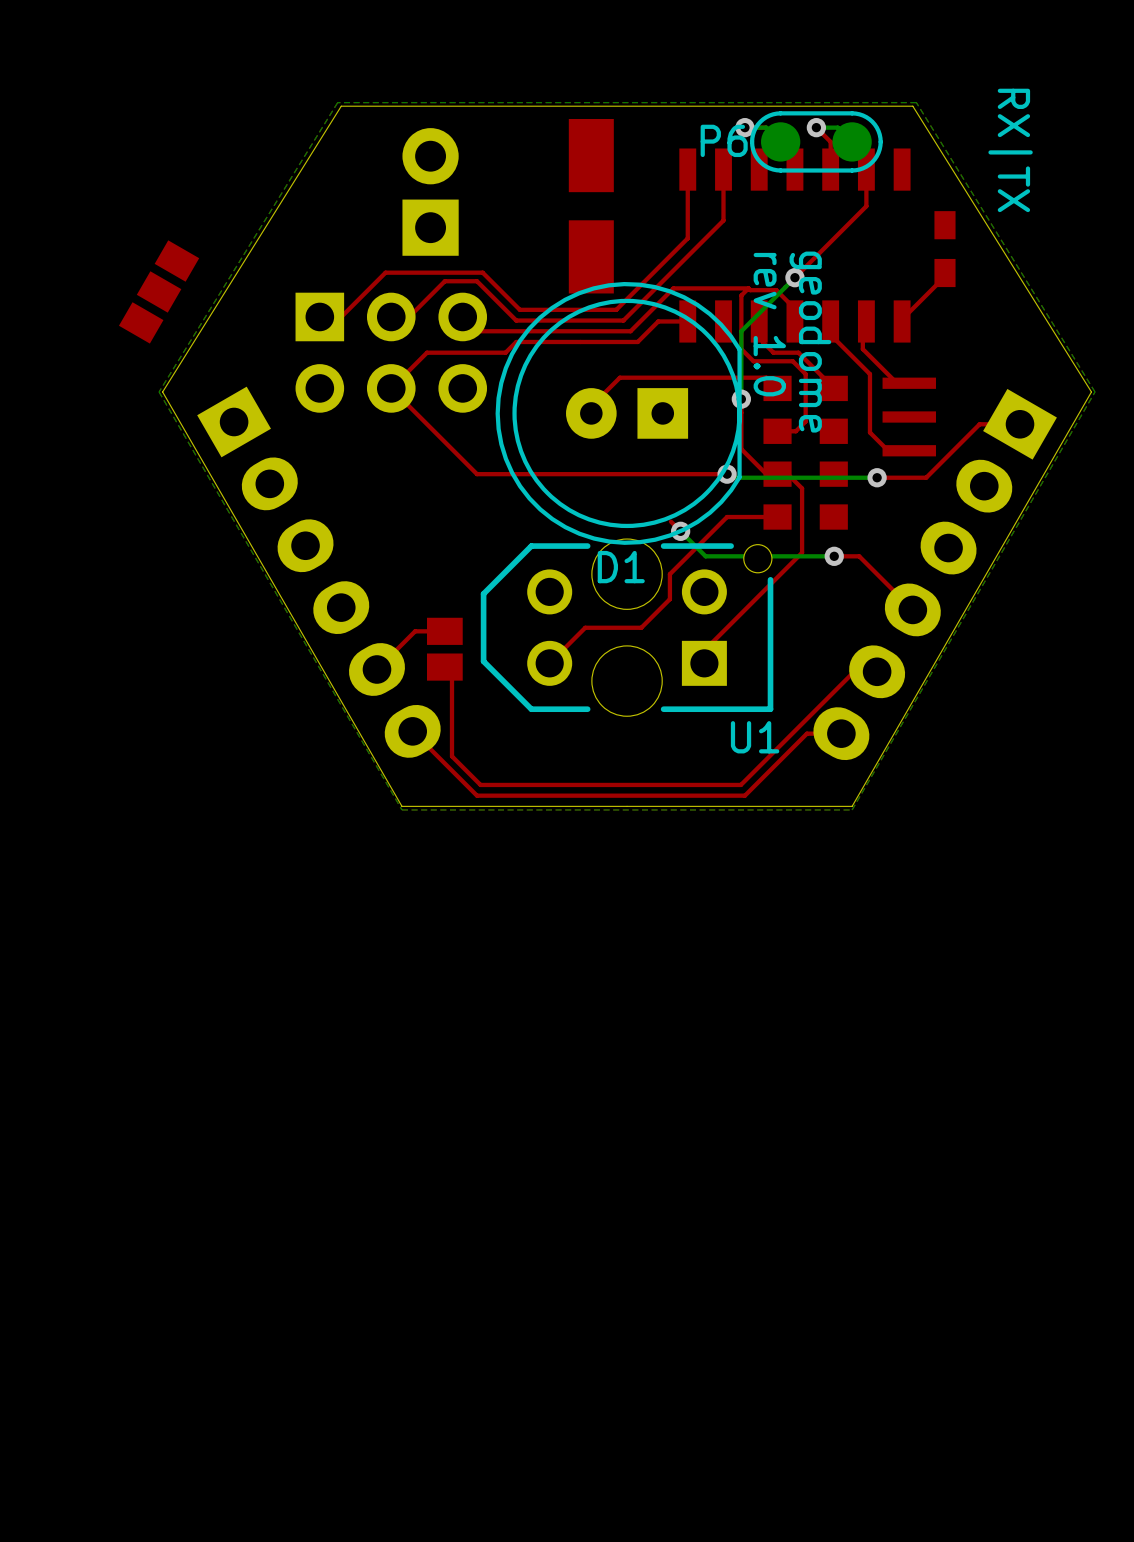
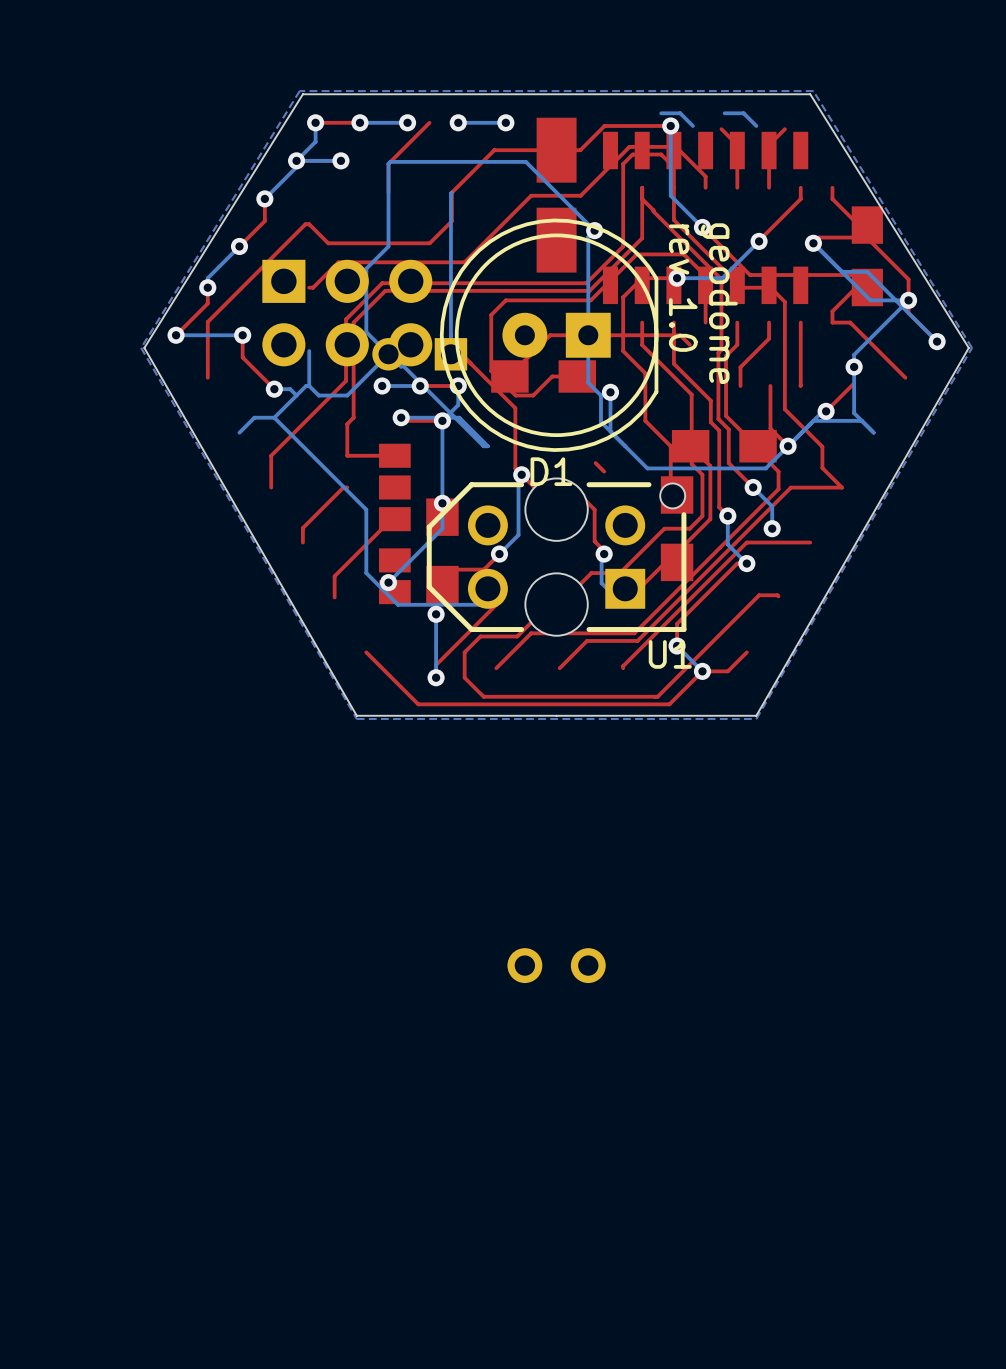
via position: (744, 127) -> (670, 125)
top track: (816, 127) (830, 141) (830, 163) -> (721, 129) (737, 145)
via: (816, 127) -> none
bottom track: none -> (315, 122) (315, 141) (296, 160)
via: none -> (315, 122)
top track: none -> (359, 122) (315, 122)
via: none -> (359, 122)
bottom track: none -> (407, 122) (359, 122)
via: none -> (407, 122)
top track: none -> (429, 122) (388, 163) (388, 192)
via: none -> (458, 122)
bottom track: none -> (505, 122) (458, 122)
via: none -> (505, 122)
top track: none -> (670, 125) (604, 125) (580, 150) (494, 150) (451, 192) (451, 221) (429, 243) (328, 243) (309, 224) (305, 224) (207, 321) (207, 377)
bottom track: none -> (670, 125) (670, 195) (702, 227)
P6: (816, 141) -> none
top track: none -> (784, 129) (769, 145) (769, 150)
text: RX|TX (1010, 150) -> none
top track: (687, 169) (687, 238) (616, 309) (519, 309) (482, 272) (385, 272) (341, 316) (319, 316) -> none
top track: (723, 169) (723, 211) -> (737, 150) (737, 187)
via: none -> (296, 160)
bottom track: none -> (340, 160) (302, 160) (264, 198)
via: none -> (340, 160)
part: (430, 191) -> none
part position: (591, 206) -> (556, 195)
top track: (866, 206) (794, 277) -> (769, 183) (769, 187)
top track: none -> (705, 187) (705, 176) (676, 146) (629, 146) (580, 195) (531, 195) (464, 262) (338, 262) (313, 287) (309, 287)
top track: none -> (800, 187) (800, 198) (759, 241)
top track: none -> (832, 187) (832, 198) (867, 233) (867, 238) (908, 279) (908, 313) (937, 341)
bottom track: none -> (451, 192) (450, 354)
top track: (723, 220) (623, 320) (516, 320) (477, 281) (444, 281) (409, 316) (391, 316) -> (642, 195) (642, 238) (589, 290) (385, 290) (353, 322) (353, 417) (347, 424) (347, 455) (394, 455)
top track: none -> (264, 198) (264, 221) (239, 246)
via: none -> (264, 198)
top track: none -> (642, 198) (721, 279) (721, 349) (718, 352) (718, 419) (728, 429) (728, 463) (753, 487)
part: (944, 249) -> none
top track: none -> (702, 227) (750, 275) (867, 275) (832, 311) (832, 322) (850, 322) (905, 377)
via: none -> (594, 230)
top track: none -> (867, 237) (819, 237) (813, 243)
bottom track: none -> (759, 241) (722, 278) (677, 278)
via: none -> (759, 241)
top track: (944, 273) (944, 276) (902, 321) -> none
bottom track: none -> (813, 243) (870, 300) (908, 300) (854, 354) (854, 413) (873, 432)
via: none -> (813, 243)
bottom track: none -> (239, 246) (207, 278) (207, 287)
via: none -> (239, 246)
bottom track: (794, 277) (741, 331) (741, 399) -> none
via position: (794, 277) -> (702, 227)
top track: (748, 288) (750, 290) (776, 290) (794, 311) -> (562, 376) (552, 376) (533, 395) (515, 395) (491, 371) (491, 314) (505, 300) (590, 300) (636, 254) (683, 254) (705, 276)
top track: (748, 288) (673, 288) (630, 331) (462, 331) (462, 316) -> none
top track: (748, 288) (741, 295) (741, 349) (753, 361) (792, 361) (805, 374) (805, 421) (795, 431) (777, 431) -> none
part: none -> (867, 256)
part: (159, 291) -> none
bottom track: none -> (841, 271) (867, 271) (937, 341)
top track: none -> (677, 278) (642, 278) (623, 297) (623, 351) (645, 373) (645, 420) (670, 446) (670, 503) (677, 509)
via: none -> (677, 278)
top track: (687, 321) (658, 321) (637, 341) (516, 341) (505, 352) (427, 352) (391, 388) (477, 474) -> (401, 417) (404, 420) (423, 420)
top track: (759, 321) (762, 325) (762, 341) (773, 352) (798, 352) (833, 387) -> none
top track: none -> (705, 285) (705, 322)
top track: (830, 321) (830, 334) (869, 374) (869, 432) (888, 450) (909, 450) -> none
top track: (866, 321) (862, 325) (862, 349) (896, 383) (909, 383) -> none
top track: none -> (207, 287) (207, 303) (176, 335)
via: none -> (207, 287)
via: none -> (908, 300)
top track: none -> (673, 322) (673, 363) (710, 400) (710, 422) (719, 430) (719, 507) (727, 516)
top track: none -> (737, 322) (737, 344) (726, 356) (726, 415) (743, 432) (743, 446) (753, 446) (778, 471) (778, 489) (634, 633) (531, 633) (496, 668)
top track: none -> (769, 322) (769, 338) (740, 367) (740, 386)
top track: none -> (800, 322) (800, 385)
via: none -> (176, 335)
top track: none -> (242, 335) (242, 357) (274, 389)
bottom track: none -> (242, 335) (176, 335)
via: none -> (242, 335)
bottom track: none -> (388, 341) (388, 354) (347, 395) (318, 395) (309, 386)
via: none -> (937, 341)
part: (805, 388) -> none
bottom track: none -> (309, 351) (309, 386)
bottom track: none -> (388, 351) (483, 446) (487, 446) (459, 417) (401, 417)
part: none -> (419, 354)
top track: (741, 399) (741, 449) (766, 474) (787, 474) (802, 488) (802, 552) (704, 650) (704, 663) -> none
via: (741, 399) -> none
bottom track: none -> (401, 366) (366, 332) (366, 268) (388, 246) (388, 163) (390, 161) (525, 161) (594, 230) (588, 236) (588, 382) (600, 395) (600, 421) (647, 468) (765, 468) (822, 411) (826, 411)
D1 position: (618, 413) -> (549, 335)
via: none -> (854, 366)
part: (909, 417) -> none
part: none -> (543, 376)
top track: (1020, 424) (979, 424) (926, 477) (877, 477) -> none
part: (805, 431) -> none
top track: none -> (854, 383) (826, 411)
bottom track: none -> (309, 386) (306, 386) (274, 417)
via: none -> (382, 386)
bottom track: none -> (420, 386) (382, 386)
via: none -> (420, 386)
top track: none -> (458, 386) (420, 386)
bottom track: none -> (458, 386) (458, 405) (442, 420) (442, 528) (388, 582)
via: none -> (458, 386)
top track: none -> (770, 386) (770, 428) (788, 446)
bottom track: none -> (274, 389) (290, 389) (296, 395)
via: none -> (274, 389)
bottom track: none -> (610, 392) (610, 431)
via: none -> (610, 392)
via: none -> (826, 411)
bottom track: none -> (274, 417) (254, 417) (239, 432)
bottom track: none -> (274, 417) (366, 509) (366, 573) (398, 604) (496, 604)
via: none -> (401, 417)
via: none -> (442, 420)
top track: (727, 474) (498, 474) -> none
bottom track: (727, 474) (730, 477) (877, 477) -> none
via: (727, 474) -> none
part: (805, 474) -> none
bottom track: none -> (861, 420) (813, 420)
via position: (877, 477) -> (788, 446)
top track: none -> (705, 446) (705, 461) (710, 466) (710, 519) (682, 547) (677, 547) (677, 550) (623, 604)
part: none -> (724, 446)
top track: (777, 517) (727, 517) (669, 574) -> (450, 341) (450, 343) (515, 408) (515, 468) (534, 487) (572, 487) (594, 509)
part: (805, 517) -> none
bottom track: (680, 531) (705, 556) (834, 556) -> none
via: (680, 531) -> none
bottom track: none -> (521, 474) (518, 481) (518, 535) (499, 554)
via: none -> (521, 474)
top track: none -> (271, 487) (271, 455) (346, 380) (346, 319) (382, 283) (586, 283) (623, 246) (623, 164) (632, 154) (661, 154) (673, 167) (673, 220) (741, 287) (770, 287) (784, 301) (784, 409) (822, 446) (822, 468) (841, 487) (790, 487) (637, 640) (587, 640) (559, 668)
top track: none -> (347, 487) (343, 487) (302, 528) (302, 542)
part: none -> (394, 487)
bottom track: none -> (753, 487) (772, 506) (772, 528)
top track: (834, 556) (859, 556) (912, 609) -> none
via position: (834, 556) -> (753, 487)
via: none -> (442, 503)
part: (318, 572) -> none
part: (935, 574) -> none
bottom track: none -> (727, 516) (727, 544) (746, 563)
via: none -> (727, 516)
top track: none -> (391, 519) (334, 576) (334, 597)
part: none -> (677, 528)
via: none -> (772, 528)
top track: (669, 599) (641, 627) (585, 627) (549, 663) -> (594, 531) (594, 541) (604, 550) (604, 554)
top track: none -> (810, 542) (746, 542) (623, 668)
part: none -> (442, 550)
top track: none -> (499, 554) (483, 569) (442, 569)
via: none -> (499, 554)
bottom track: none -> (604, 554) (601, 556) (601, 583) (623, 604)
via: none -> (604, 554)
top track: (444, 631) (415, 631) (376, 669) -> none
top track: none -> (746, 563) (737, 563) (677, 623) (677, 646)
via: none -> (746, 563)
via: none -> (388, 582)
top track: (444, 667) (452, 674) (452, 756) (480, 784) (544, 784) -> (642, 322) (642, 345) (691, 394) (691, 464) (702, 474) (702, 516) (689, 528) (664, 528) (620, 573) (591, 573) (559, 604) (548, 604) (517, 636) (480, 636) (464, 652) (464, 677) (483, 696)
top track: none -> (496, 604) (436, 665) (436, 677)
bottom track: none -> (436, 614) (436, 677)
via: none -> (436, 614)
bottom track: none -> (677, 646) (702, 671)
via: none -> (677, 646)
top track: (412, 731) (405, 738) (419, 738) (477, 795) (744, 795) (806, 733) (841, 733) -> none
top track: none -> (746, 652) (727, 671) (702, 671) (669, 704) (418, 704) (366, 652)
via: none -> (702, 671)
via: none -> (436, 677)
part: none -> (556, 965)

